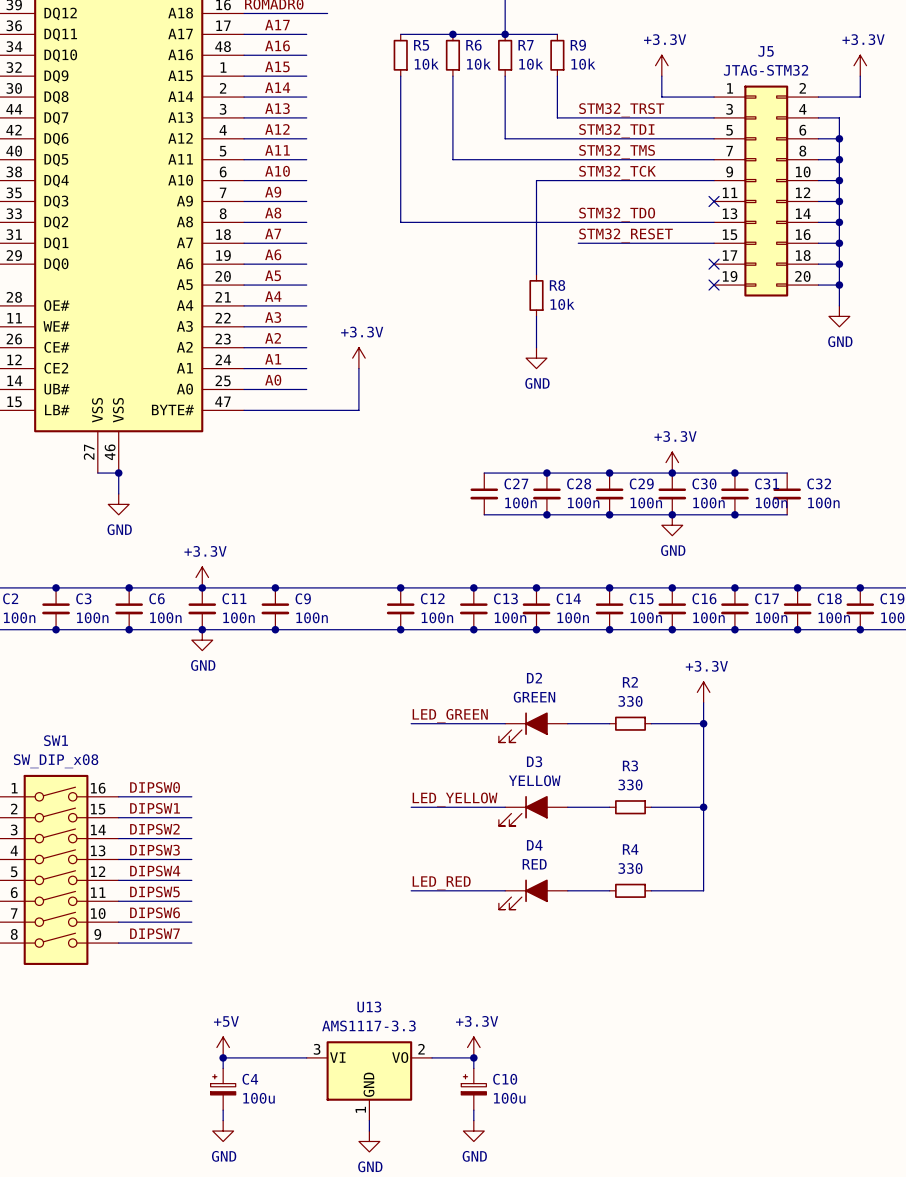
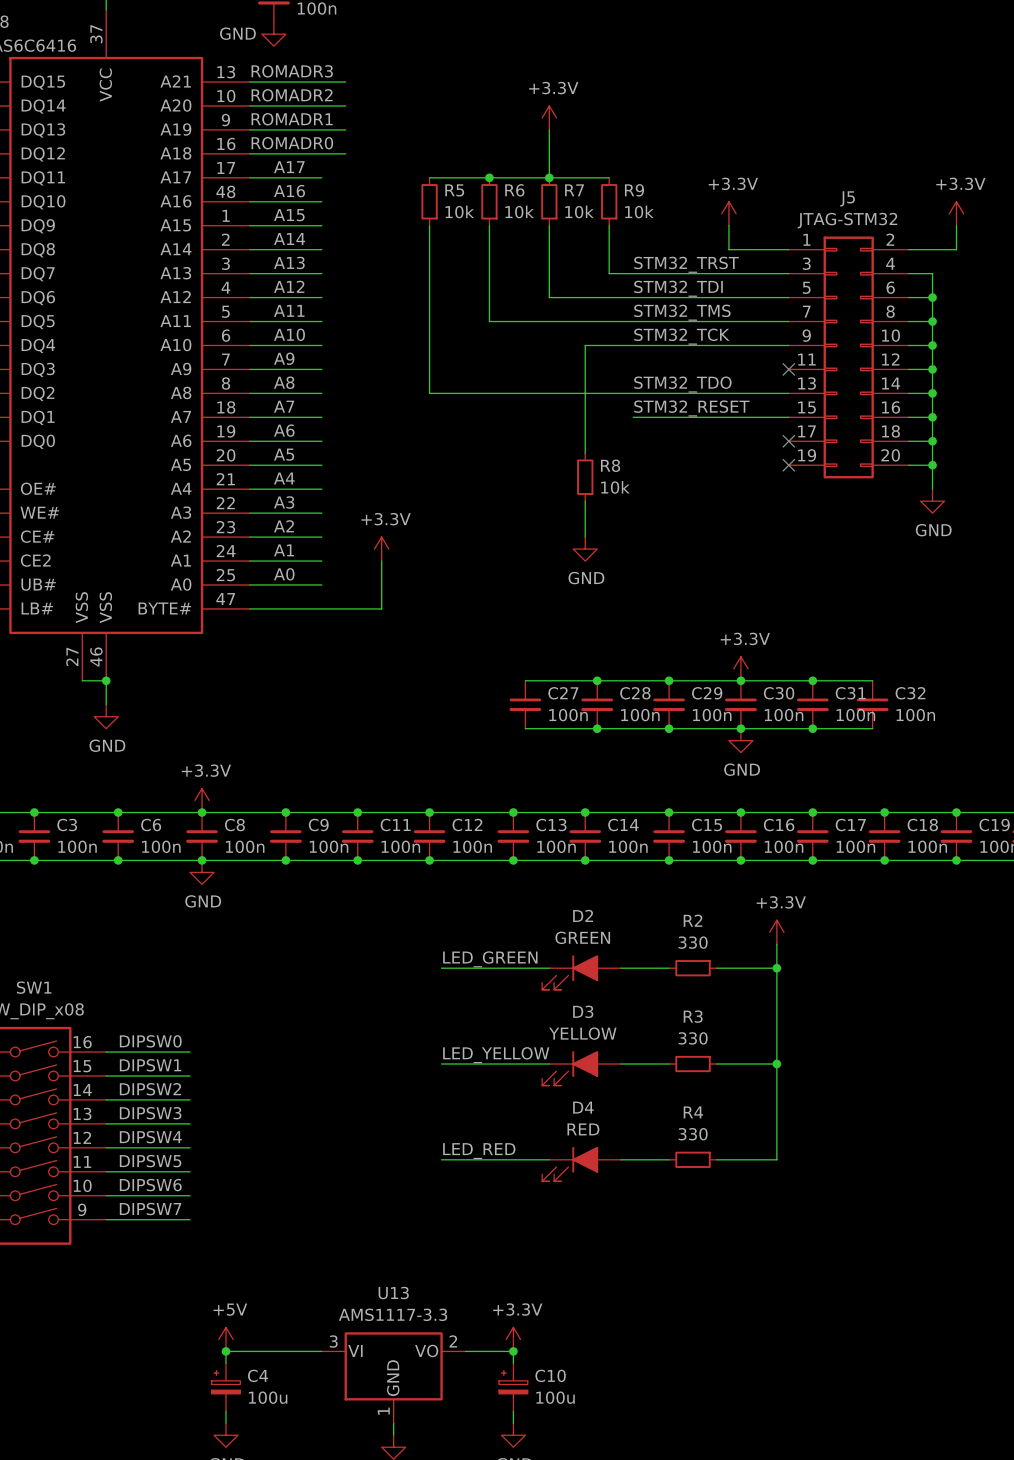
junction: none -> (357, 812)
C11 name: C11 (234, 598) -> C8 (234, 825)
C11: none -> 100n (357, 836)
junction: none -> (357, 860)

